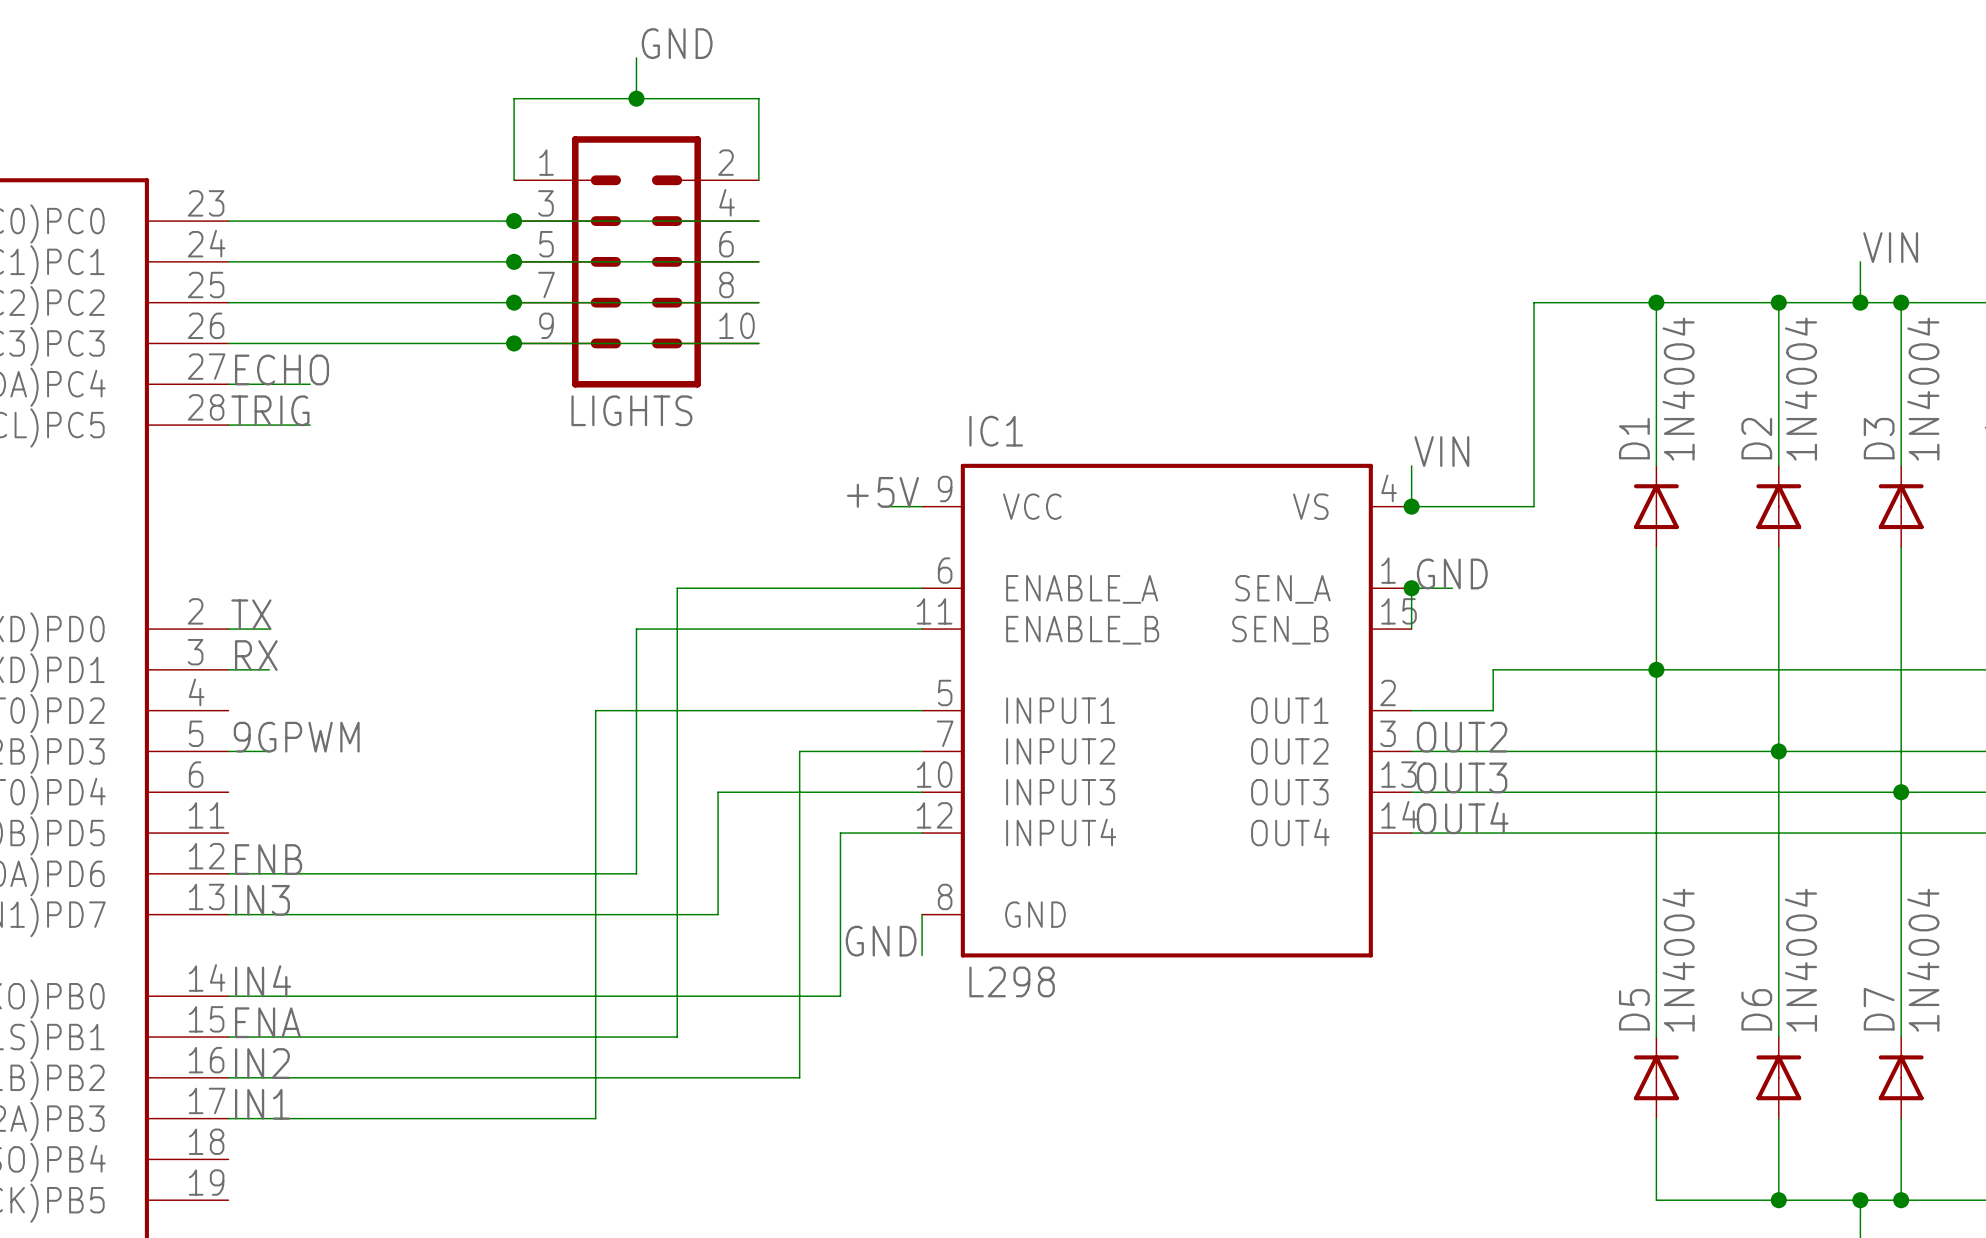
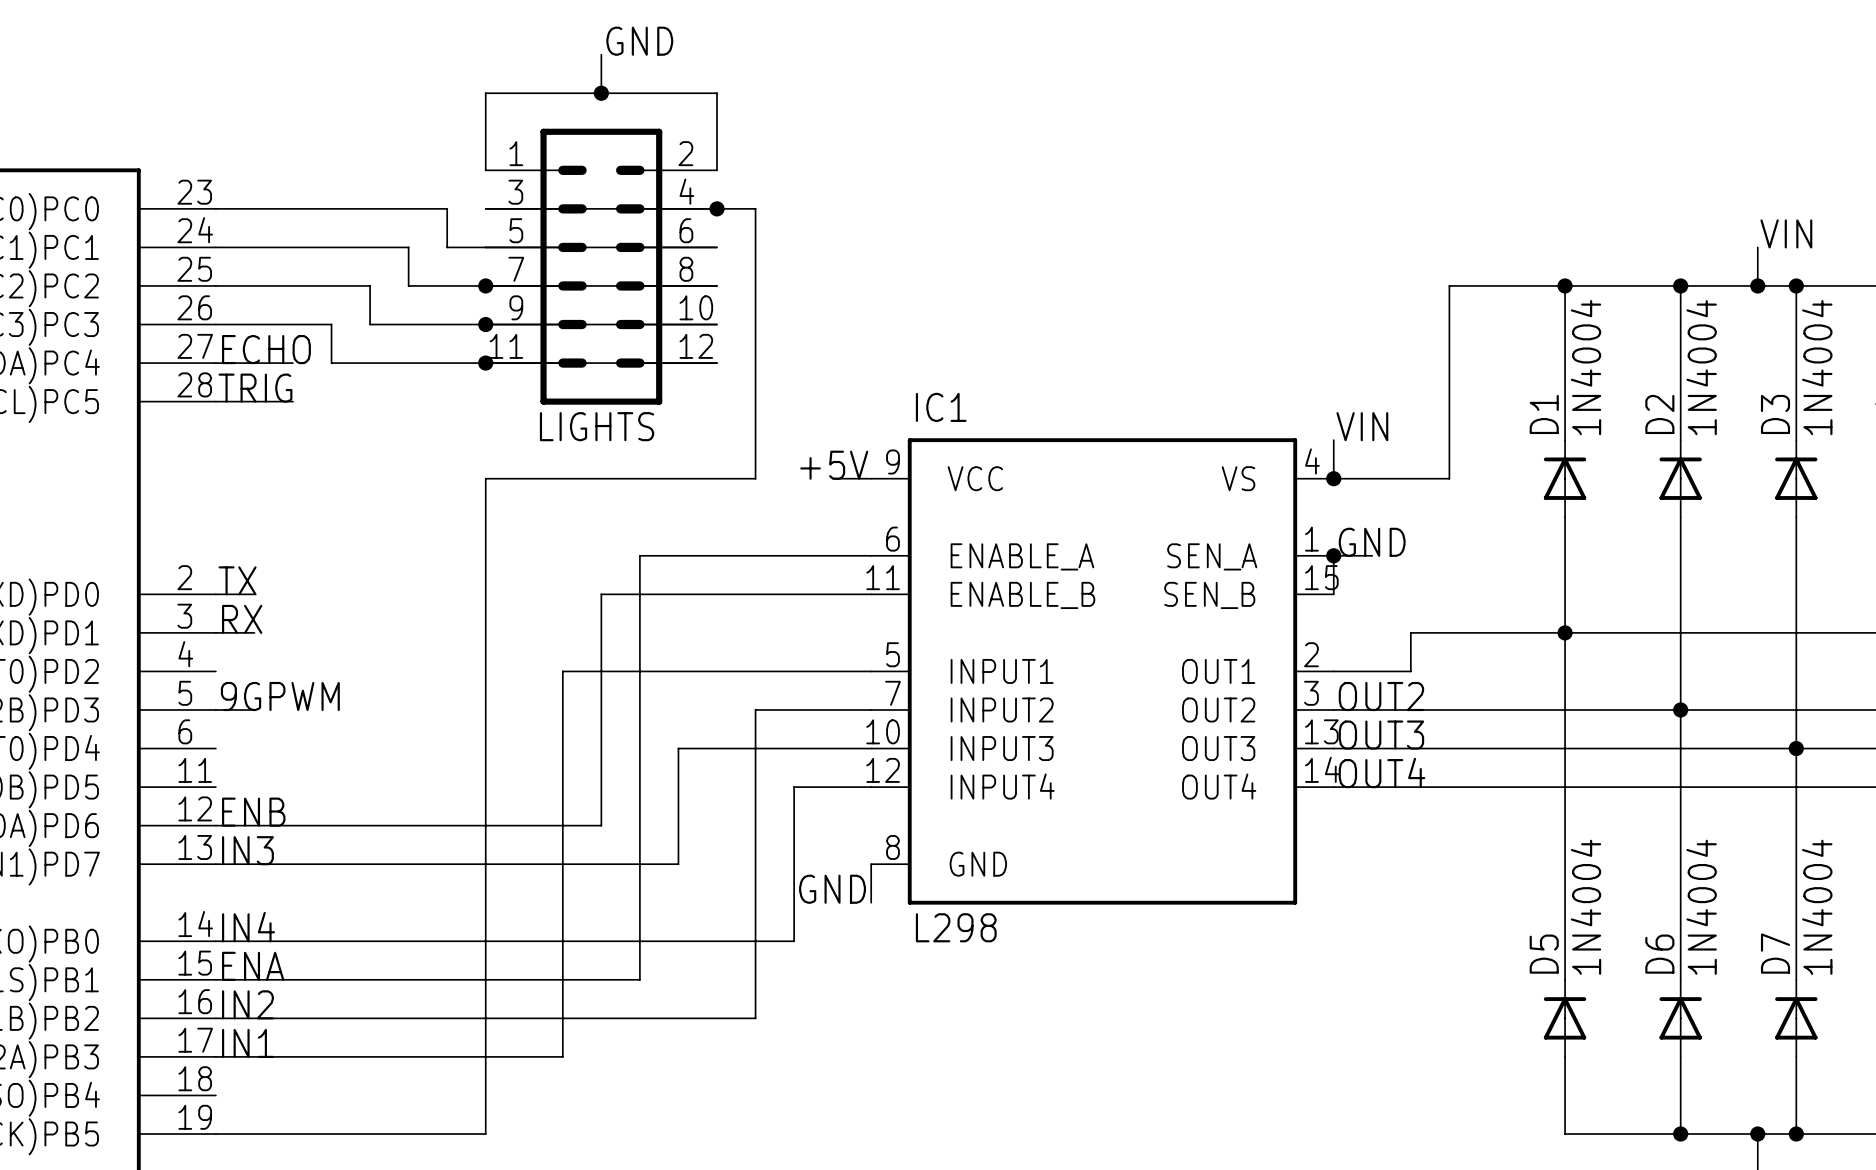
wire: (473, 221) (514, 221) -> (447, 208) (447, 247)
junction: (514, 221) -> none
wire: none -> (717, 208) (755, 208) (755, 478) (485, 478) (485, 1134) (215, 1134)
junction: none -> (717, 208)
wire: (432, 261) (473, 261) -> (408, 247) (408, 285)
junction: (514, 261) -> none
LIGHTS: (636, 261) -> none
LIGHTS: none -> (601, 266)
wire: (391, 302) (432, 302) -> (370, 285) (370, 324)
wire: (350, 343) (391, 343) -> (331, 324) (331, 363) (717, 363)
junction: none -> (485, 363)

